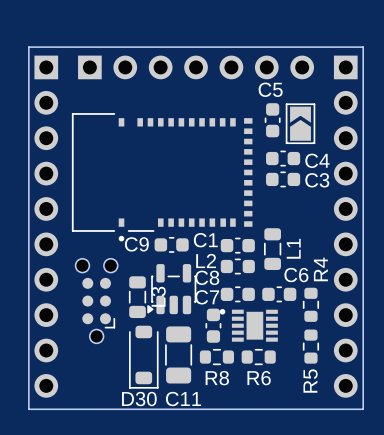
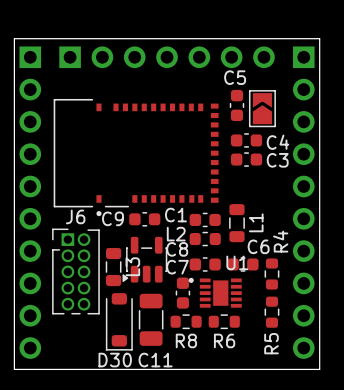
U1 name: none -> U1 (237, 262)
part: (96, 301) -> none
J6: none -> (75, 271)

